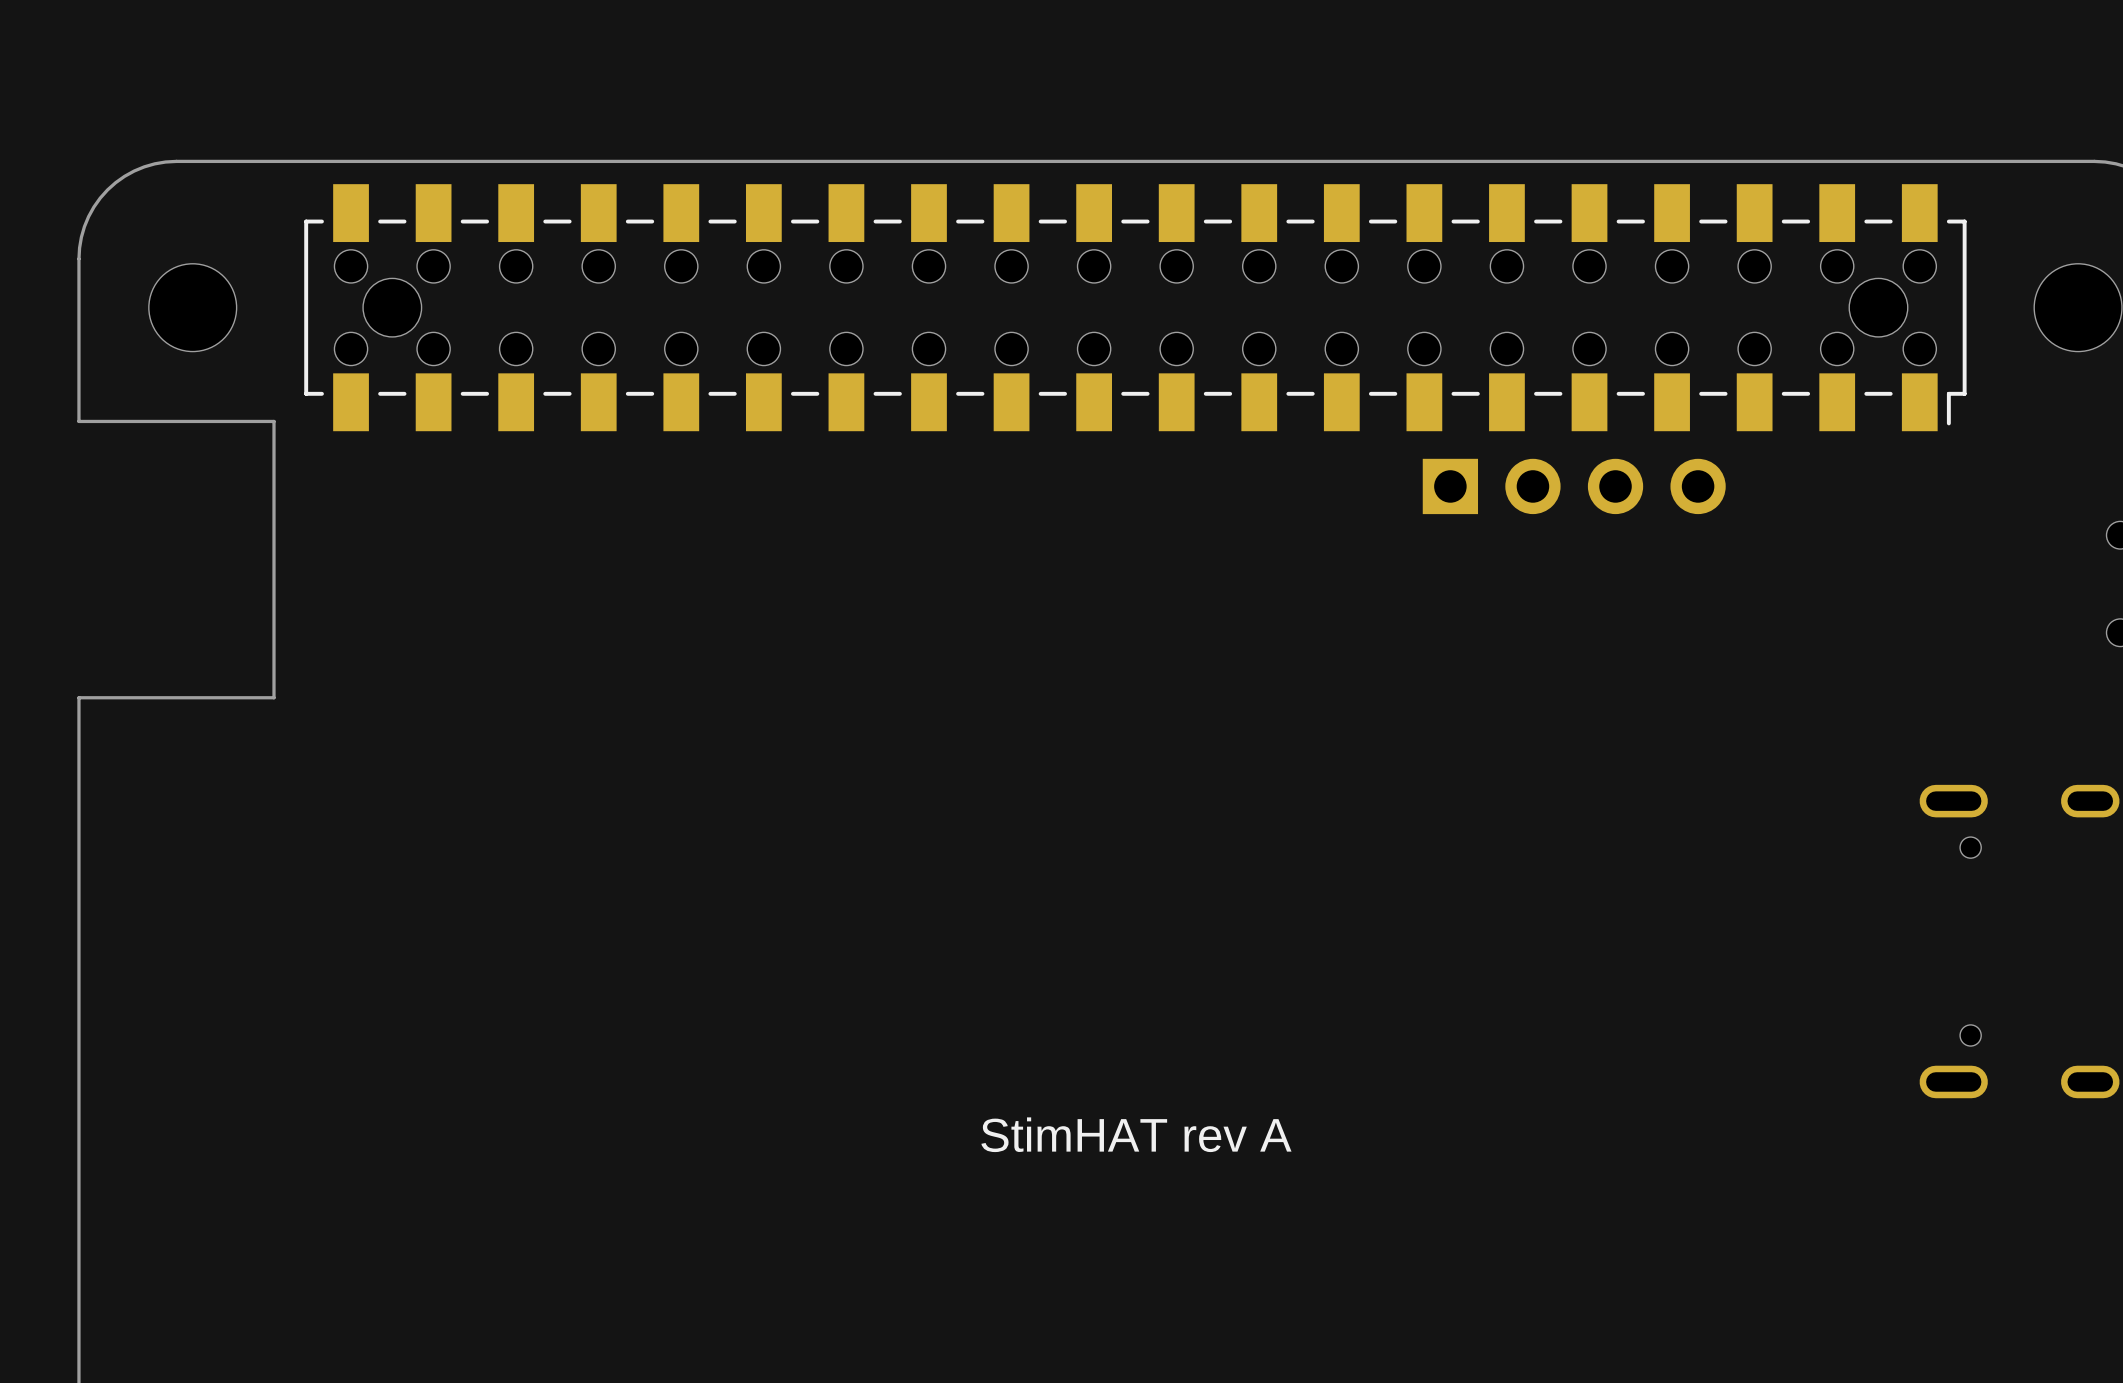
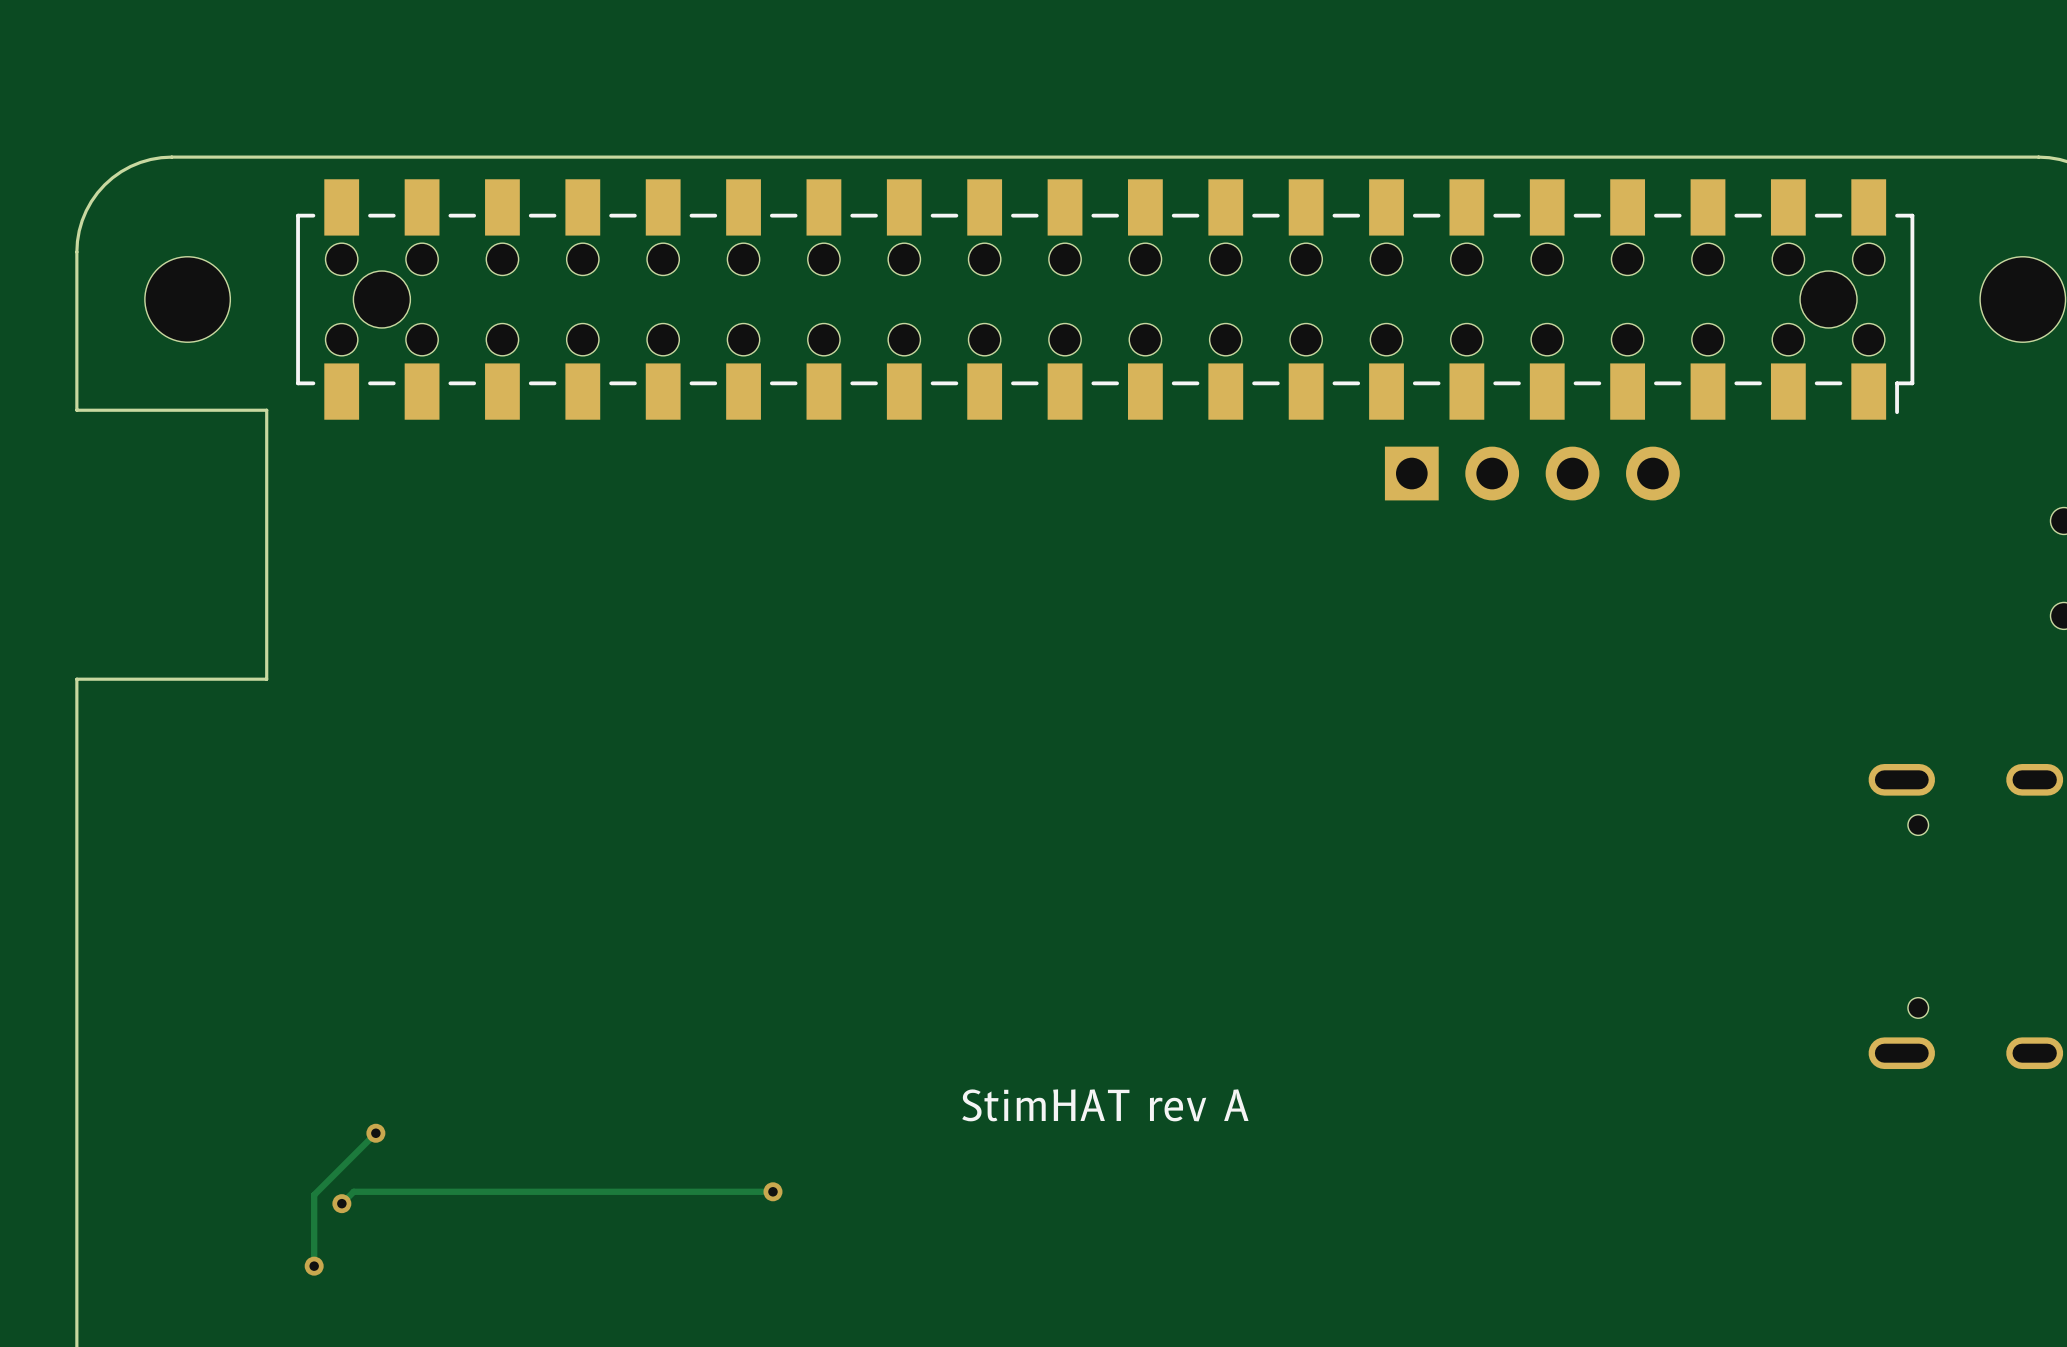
track: none -> (375, 1133) (314, 1194) (314, 1266)
via: none -> (375, 1133)
track: none -> (772, 1191) (353, 1191) (341, 1203)
via: none -> (772, 1191)
via: none -> (341, 1203)
via: none -> (314, 1266)

